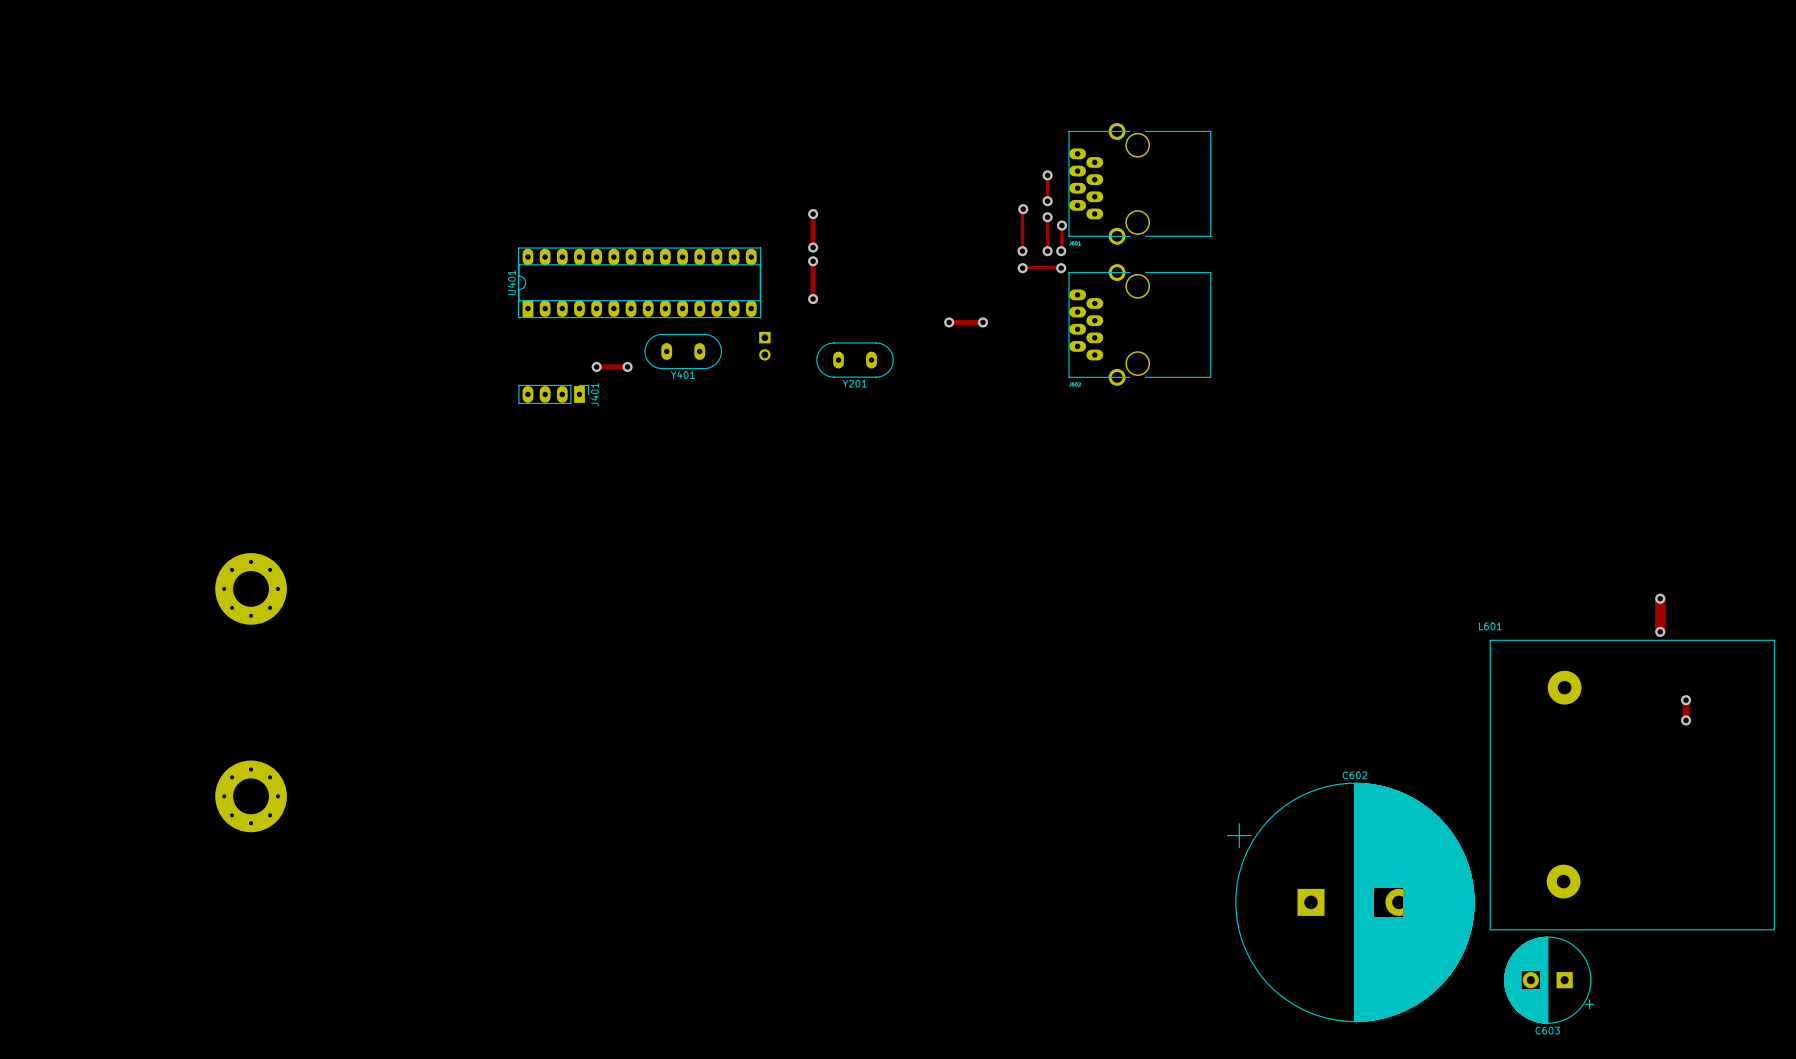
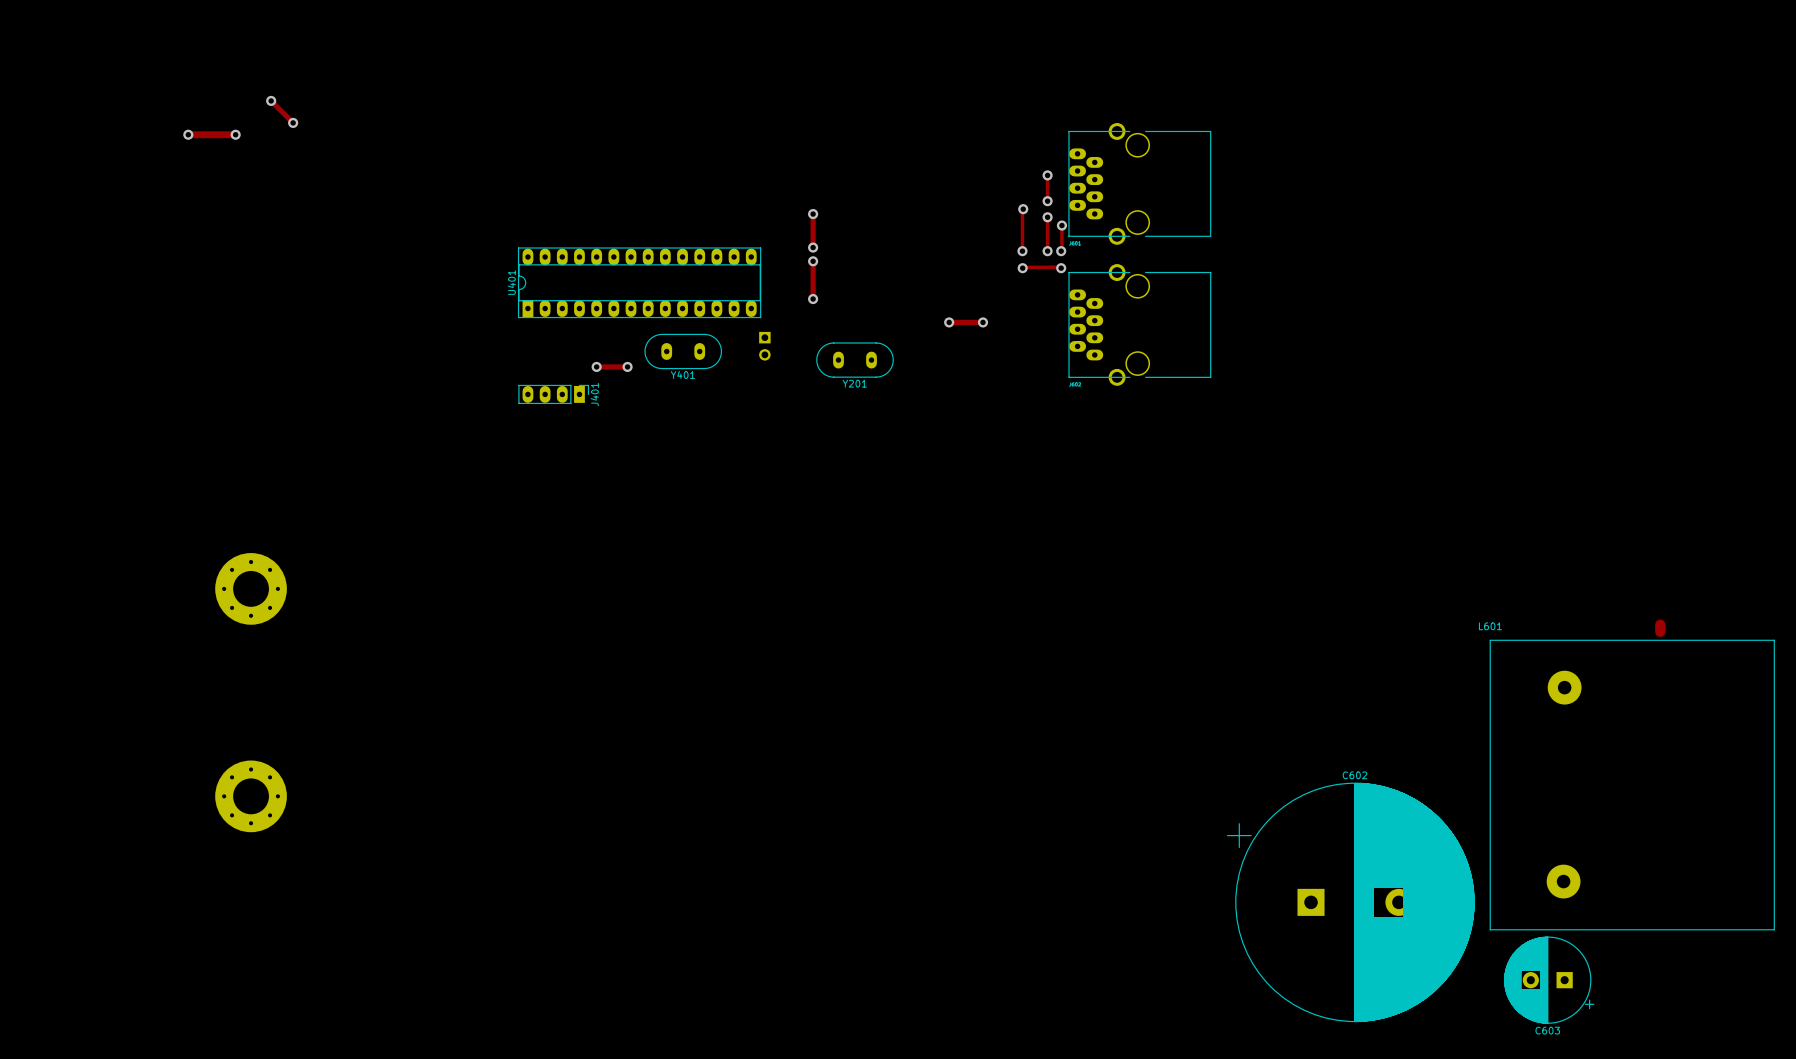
track: none -> (271, 100) (293, 122)
via: none -> (271, 100)
via: none -> (293, 122)
track: none -> (188, 134) (235, 134)
via: none -> (188, 134)
via: none -> (235, 134)
track: (1660, 598) (1660, 624) -> none
via: (1660, 598) -> none
via: (1660, 631) -> none
track: (1686, 700) (1686, 720) -> none
via: (1686, 700) -> none
via: (1686, 720) -> none

